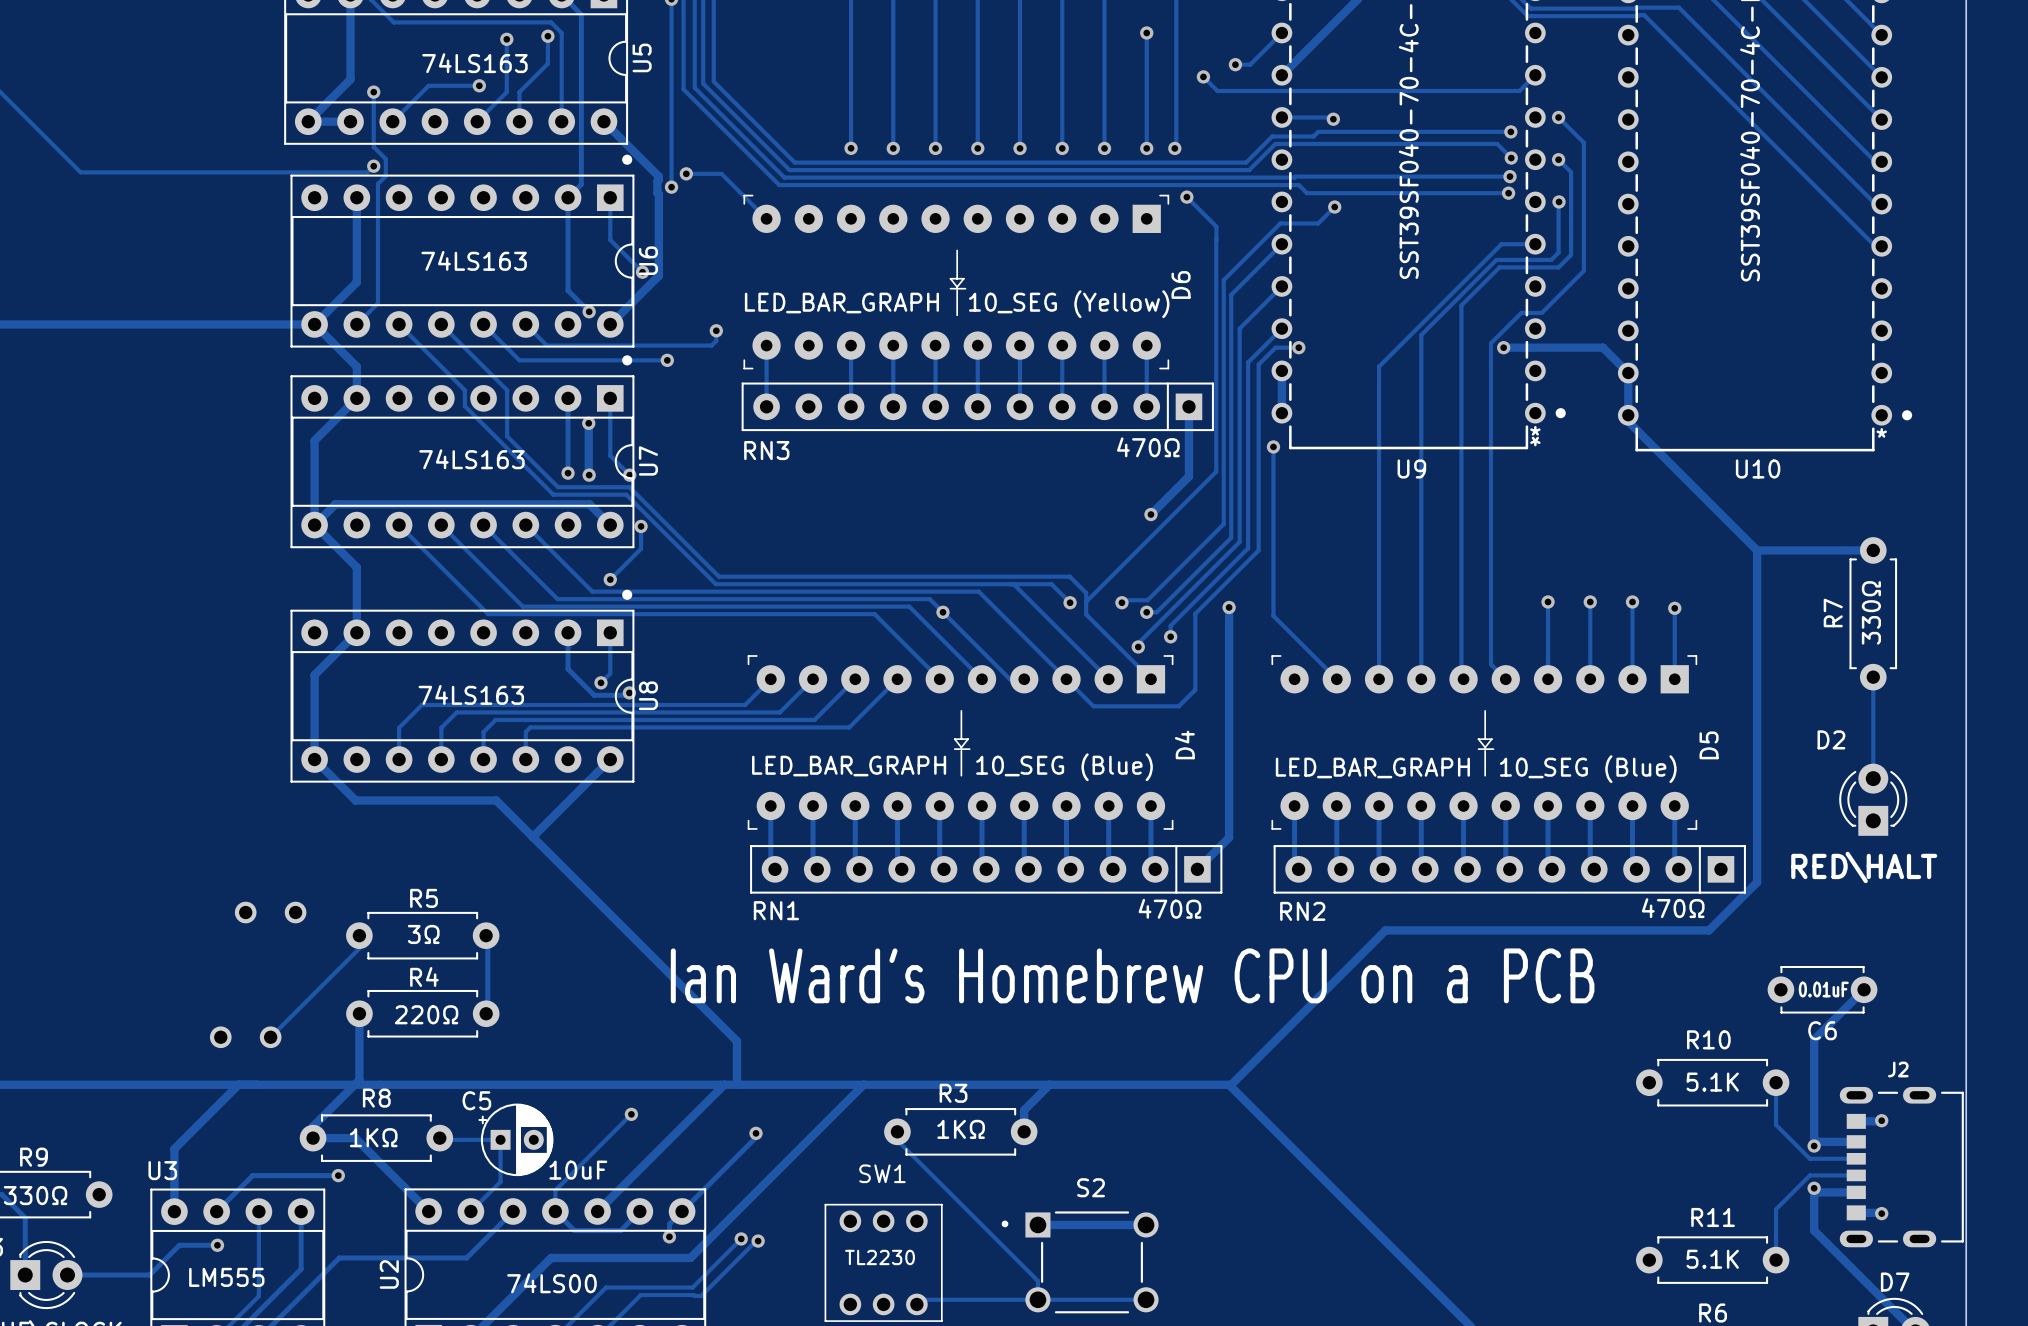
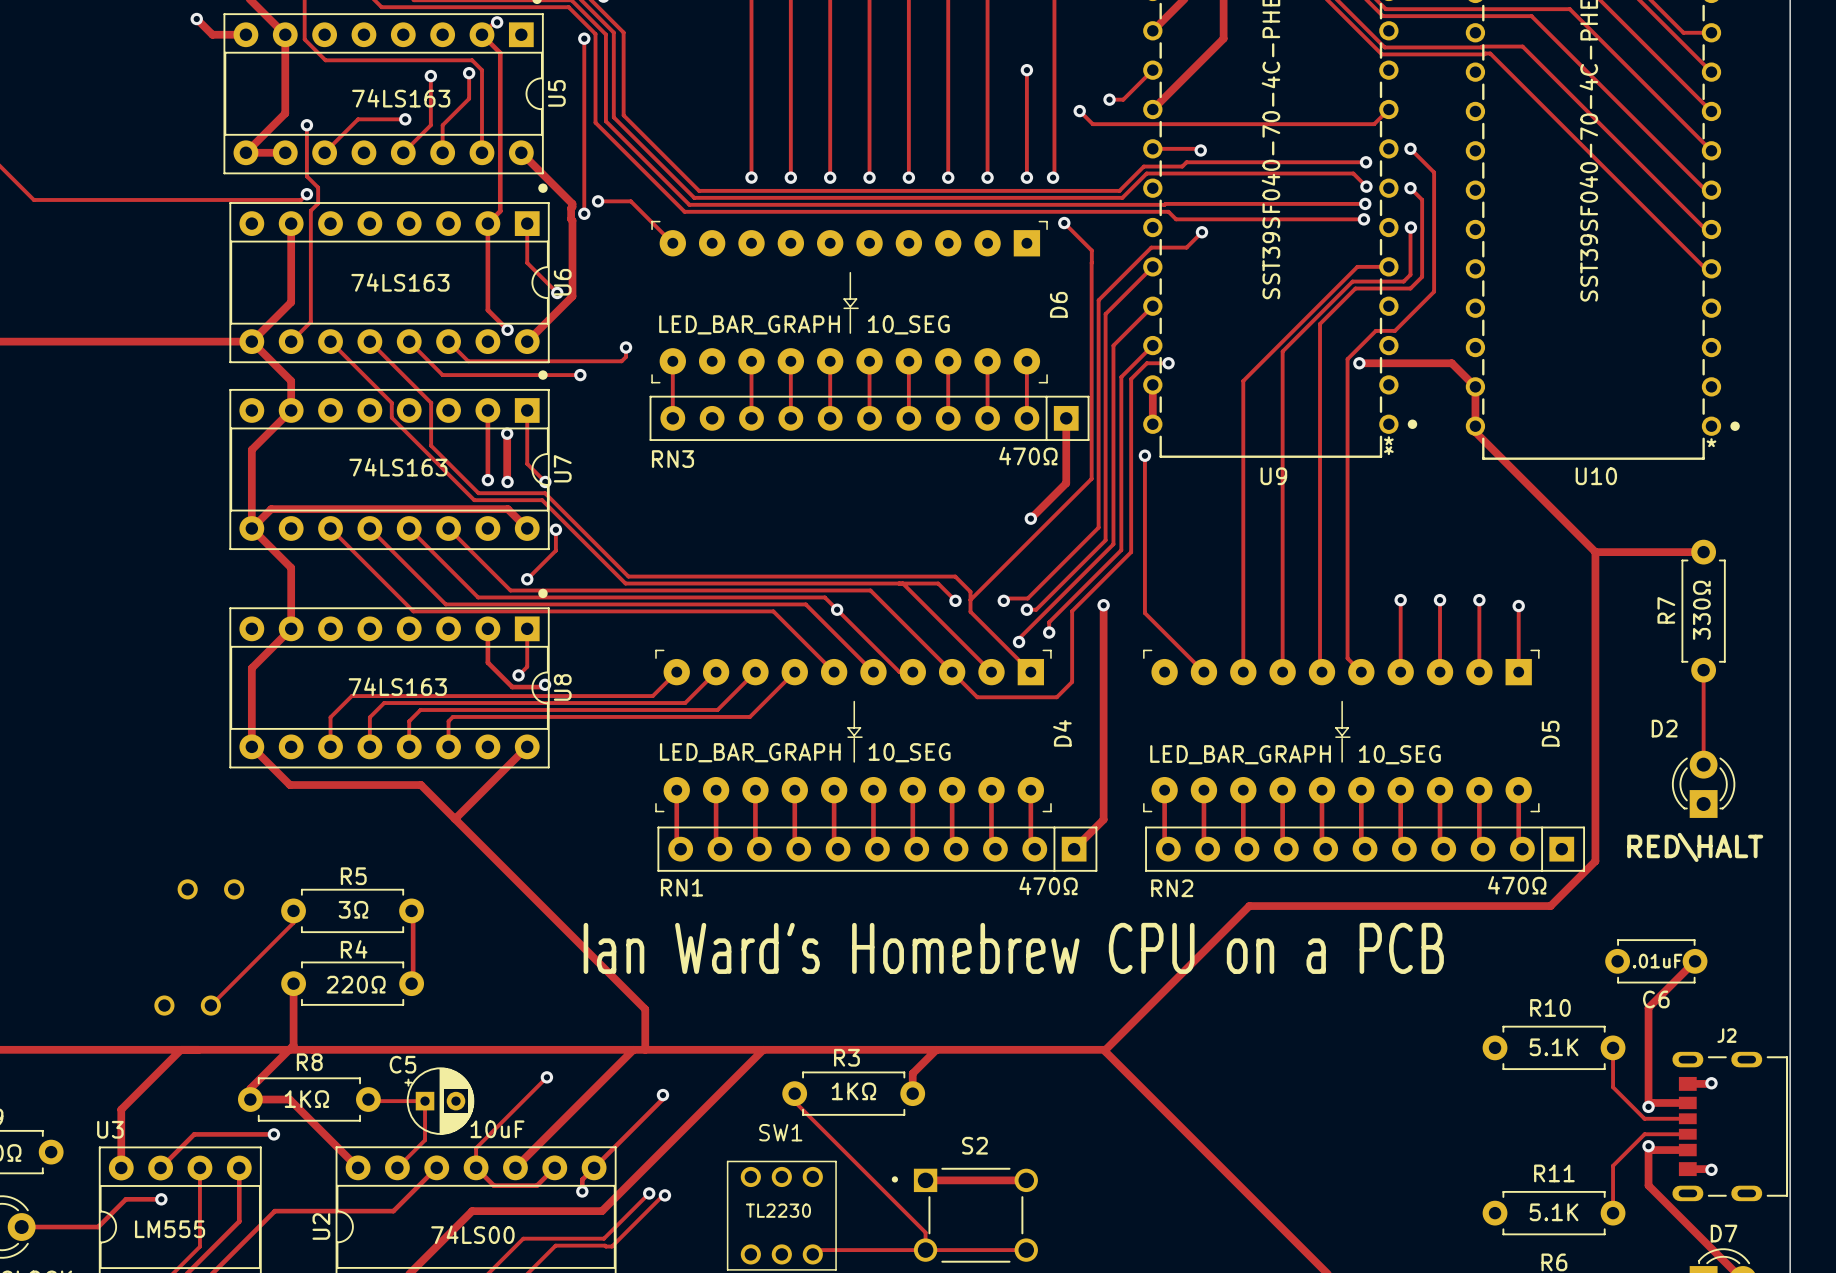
D6 value: LED_BAR_GRAPH 10_SEG (Yellow) (957, 304) -> LED_BAR_GRAPH 10_SEG (804, 324)
D4 value: LED_BAR_GRAPH 10_SEG (Blue) (952, 767) -> LED_BAR_GRAPH 10_SEG (805, 752)
D5 value: LED_BAR_GRAPH 10_SEG (Blue) (1476, 769) -> LED_BAR_GRAPH 10_SEG (1295, 754)
C6 value: 0.01uF (1823, 989) -> .01uF (1657, 961)

